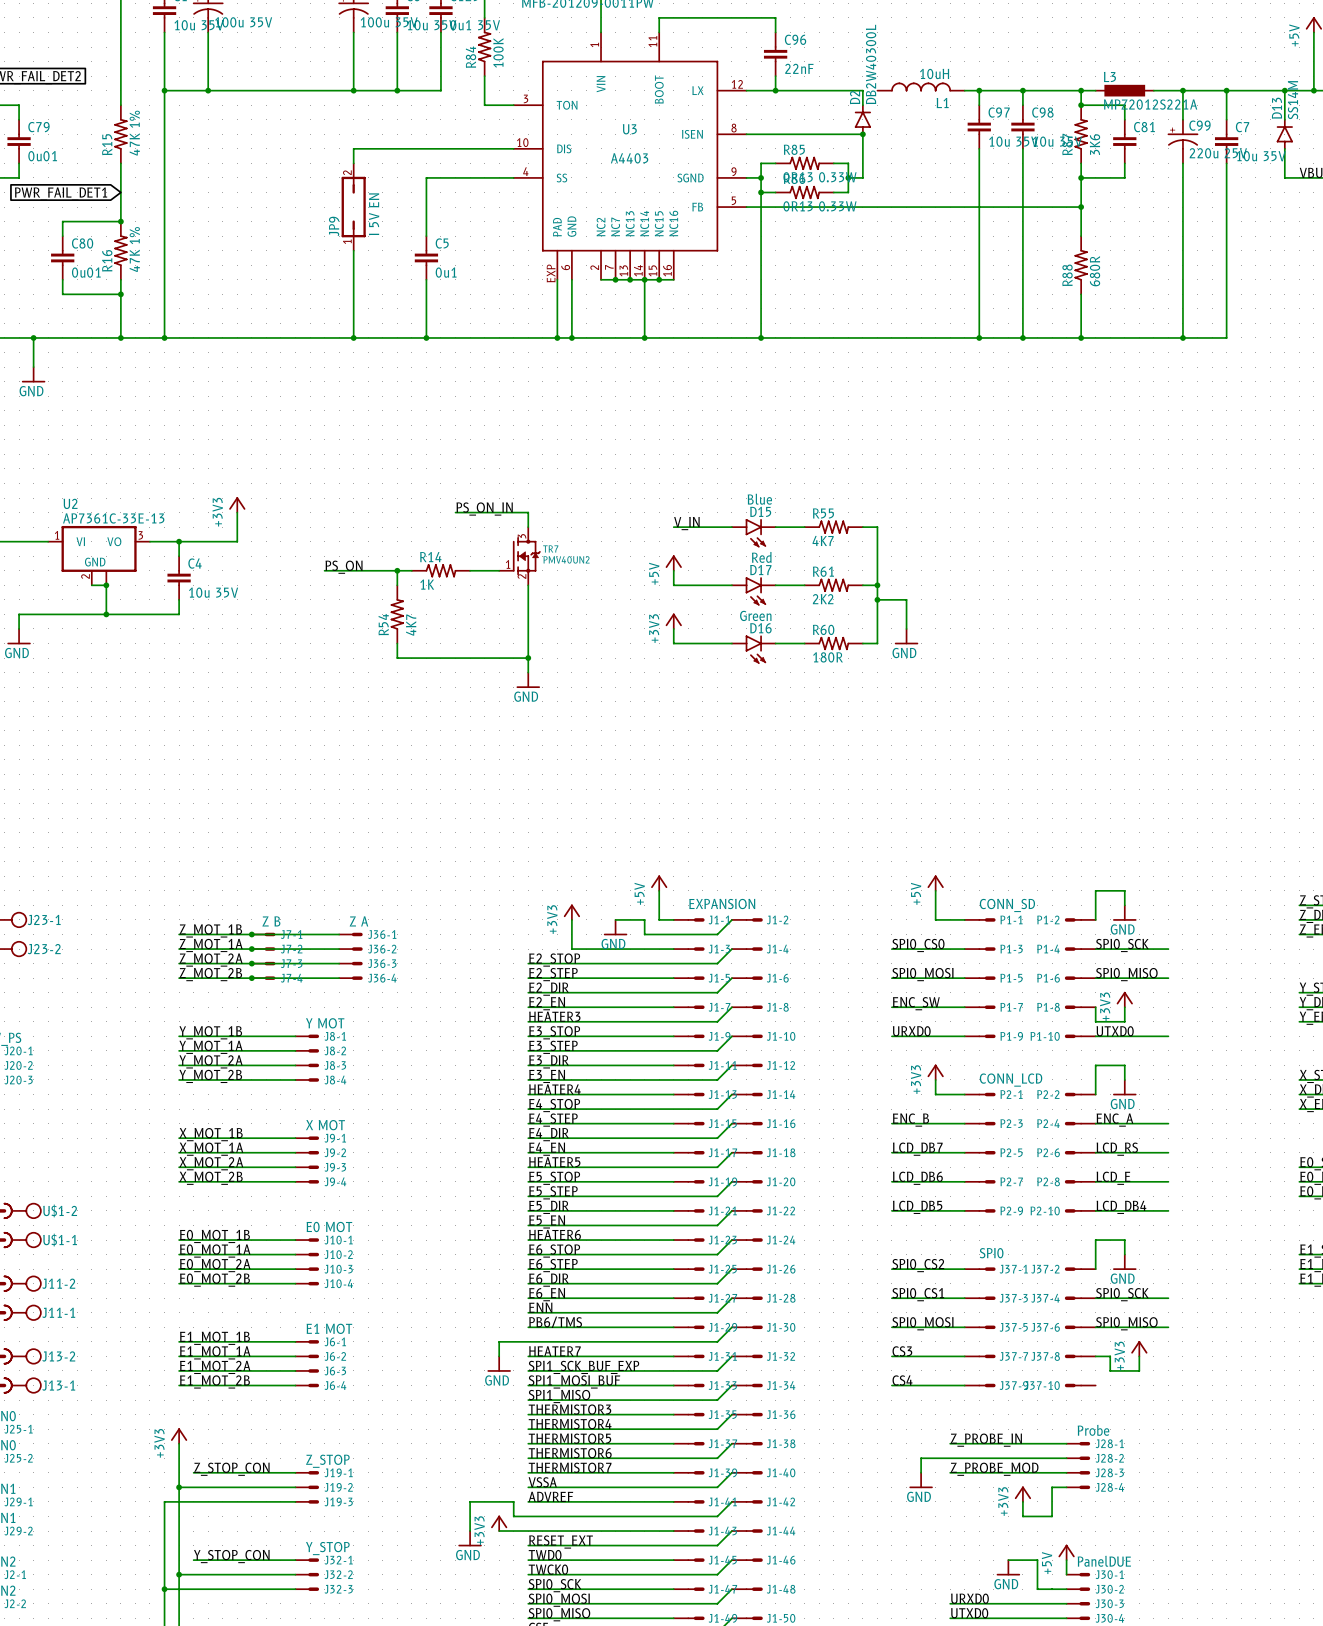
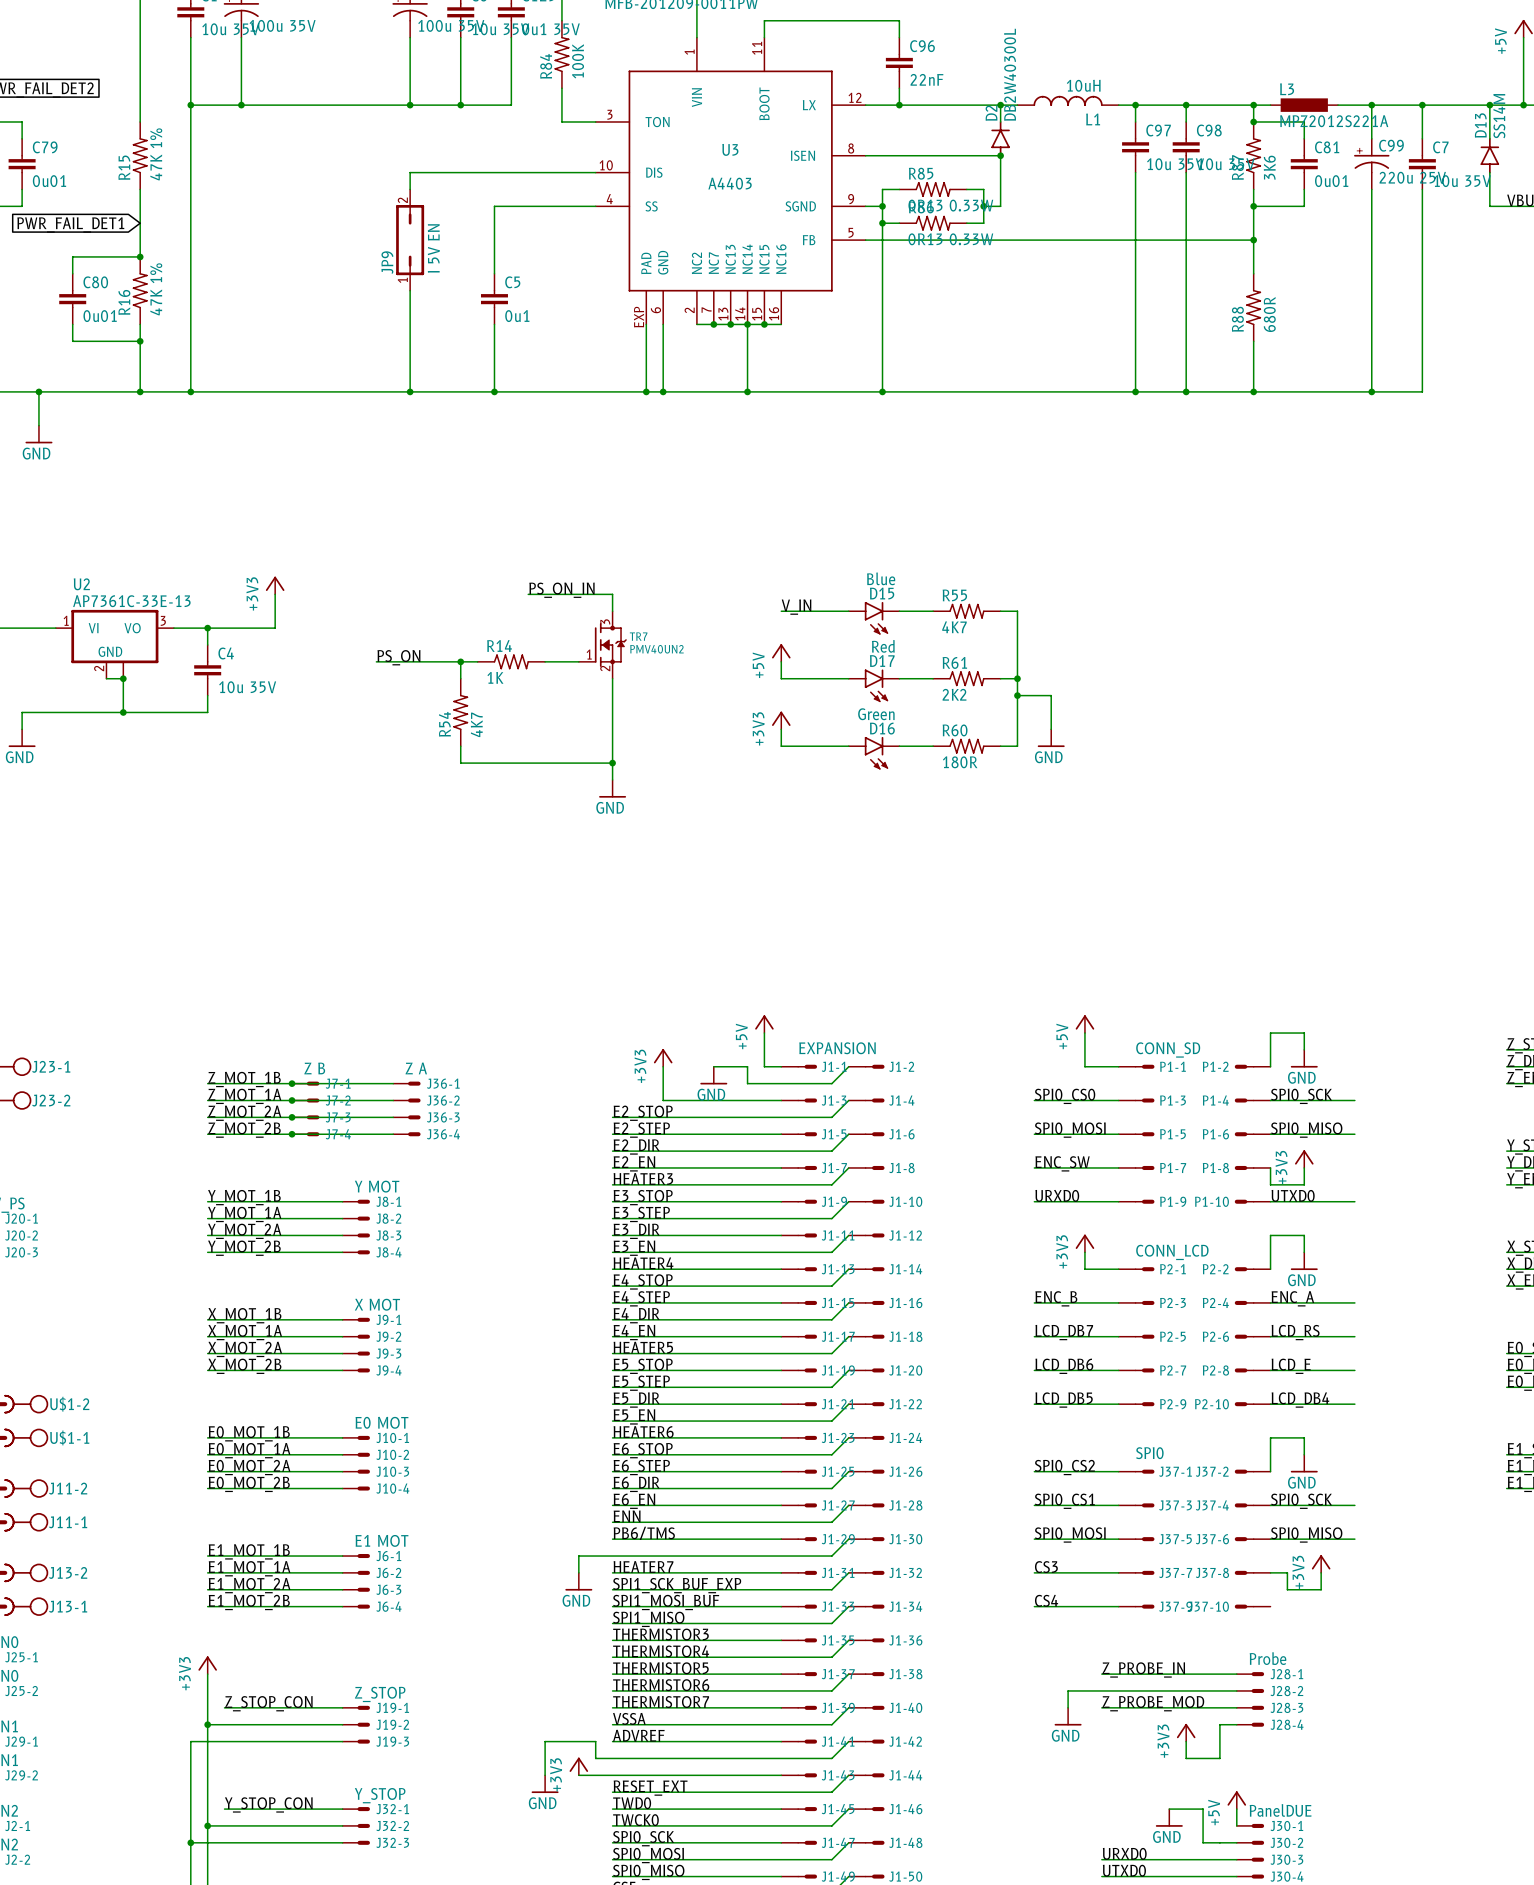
wire: none -> (1000, 105) (1017, 105)
junction: none -> (1000, 105)
C81 value: none -> 0u01 (1331, 181)

